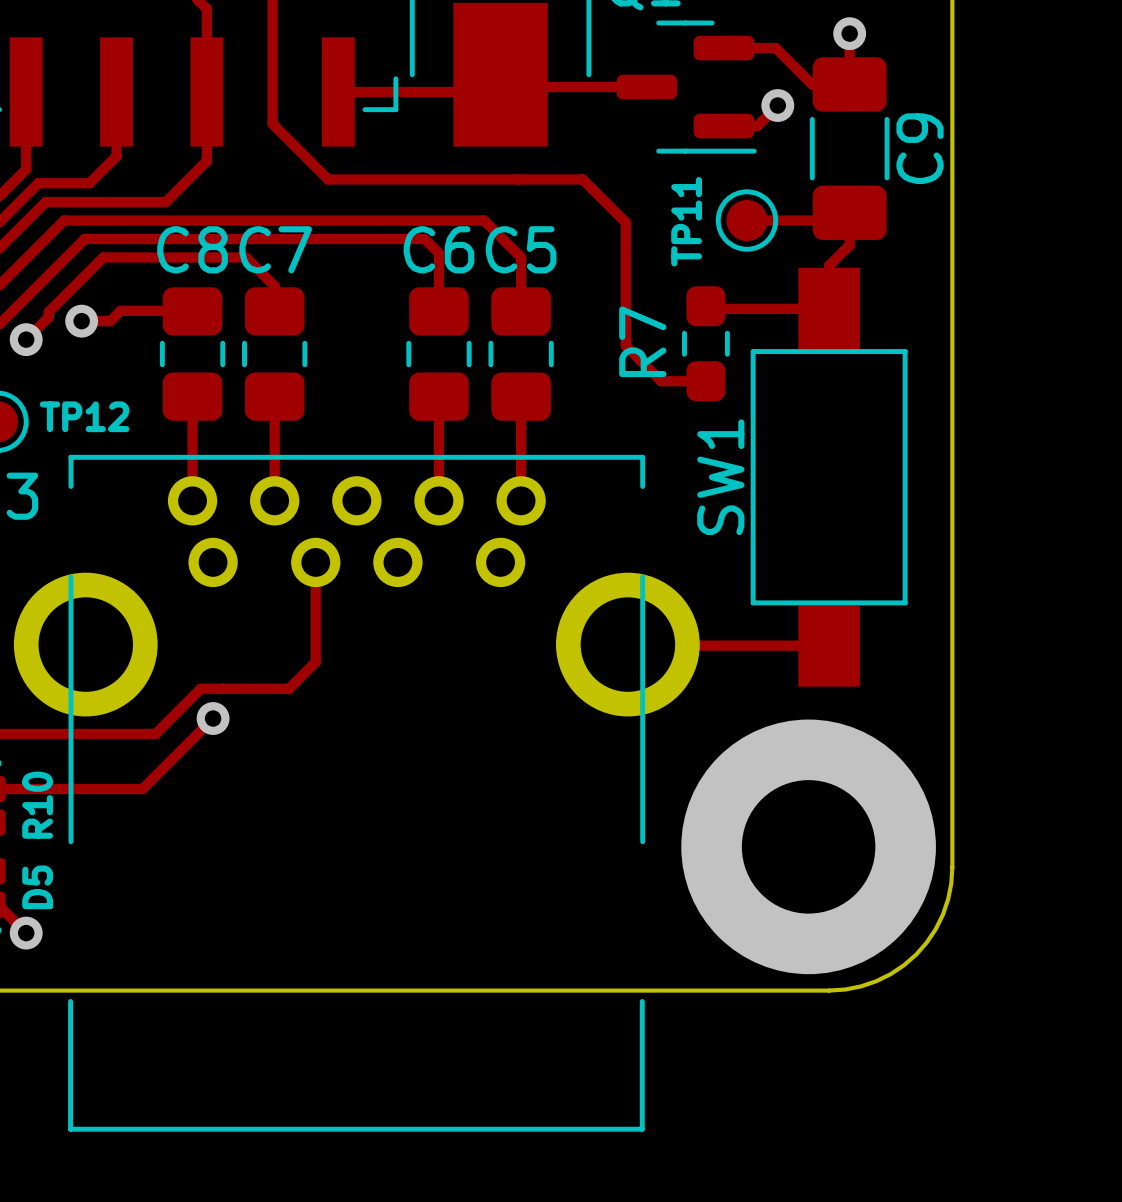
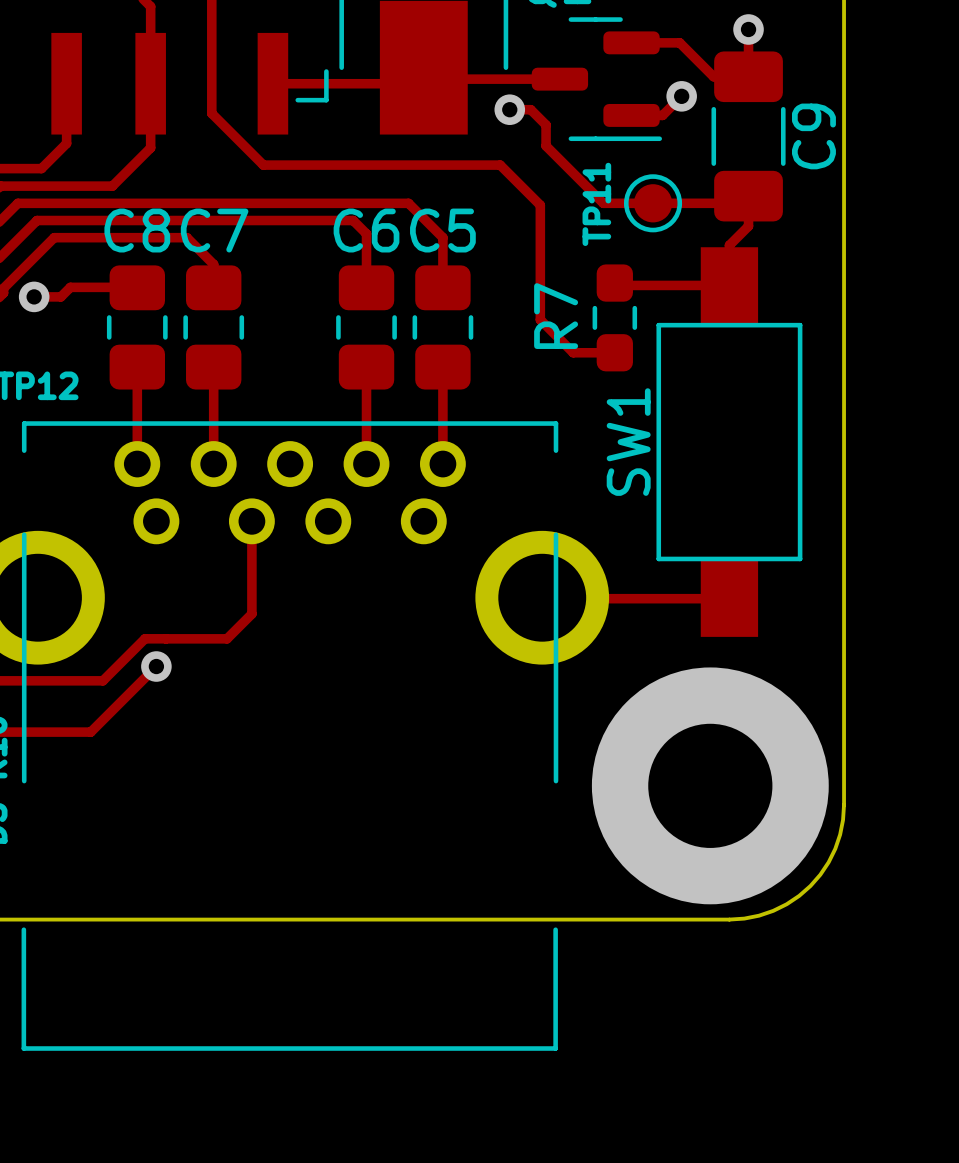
track: none -> (509, 109) (530, 109) (546, 124) (546, 146) (603, 203) (653, 203)
via: none -> (509, 109)

